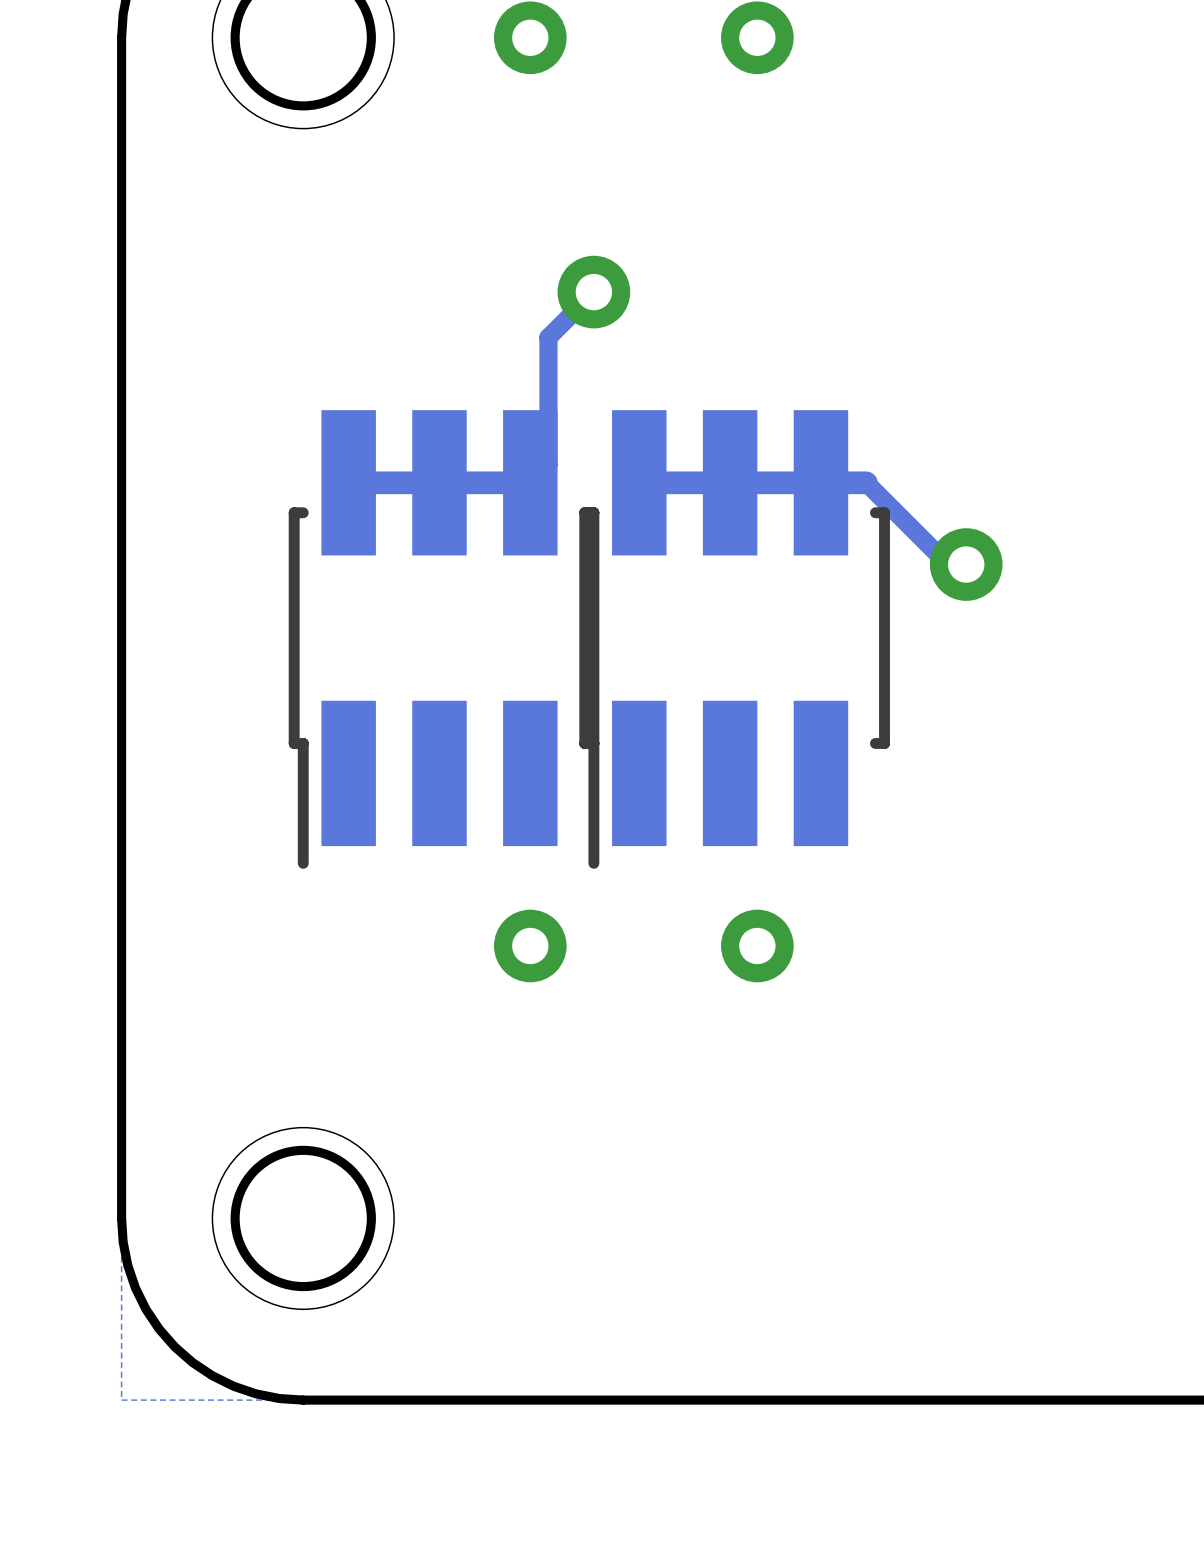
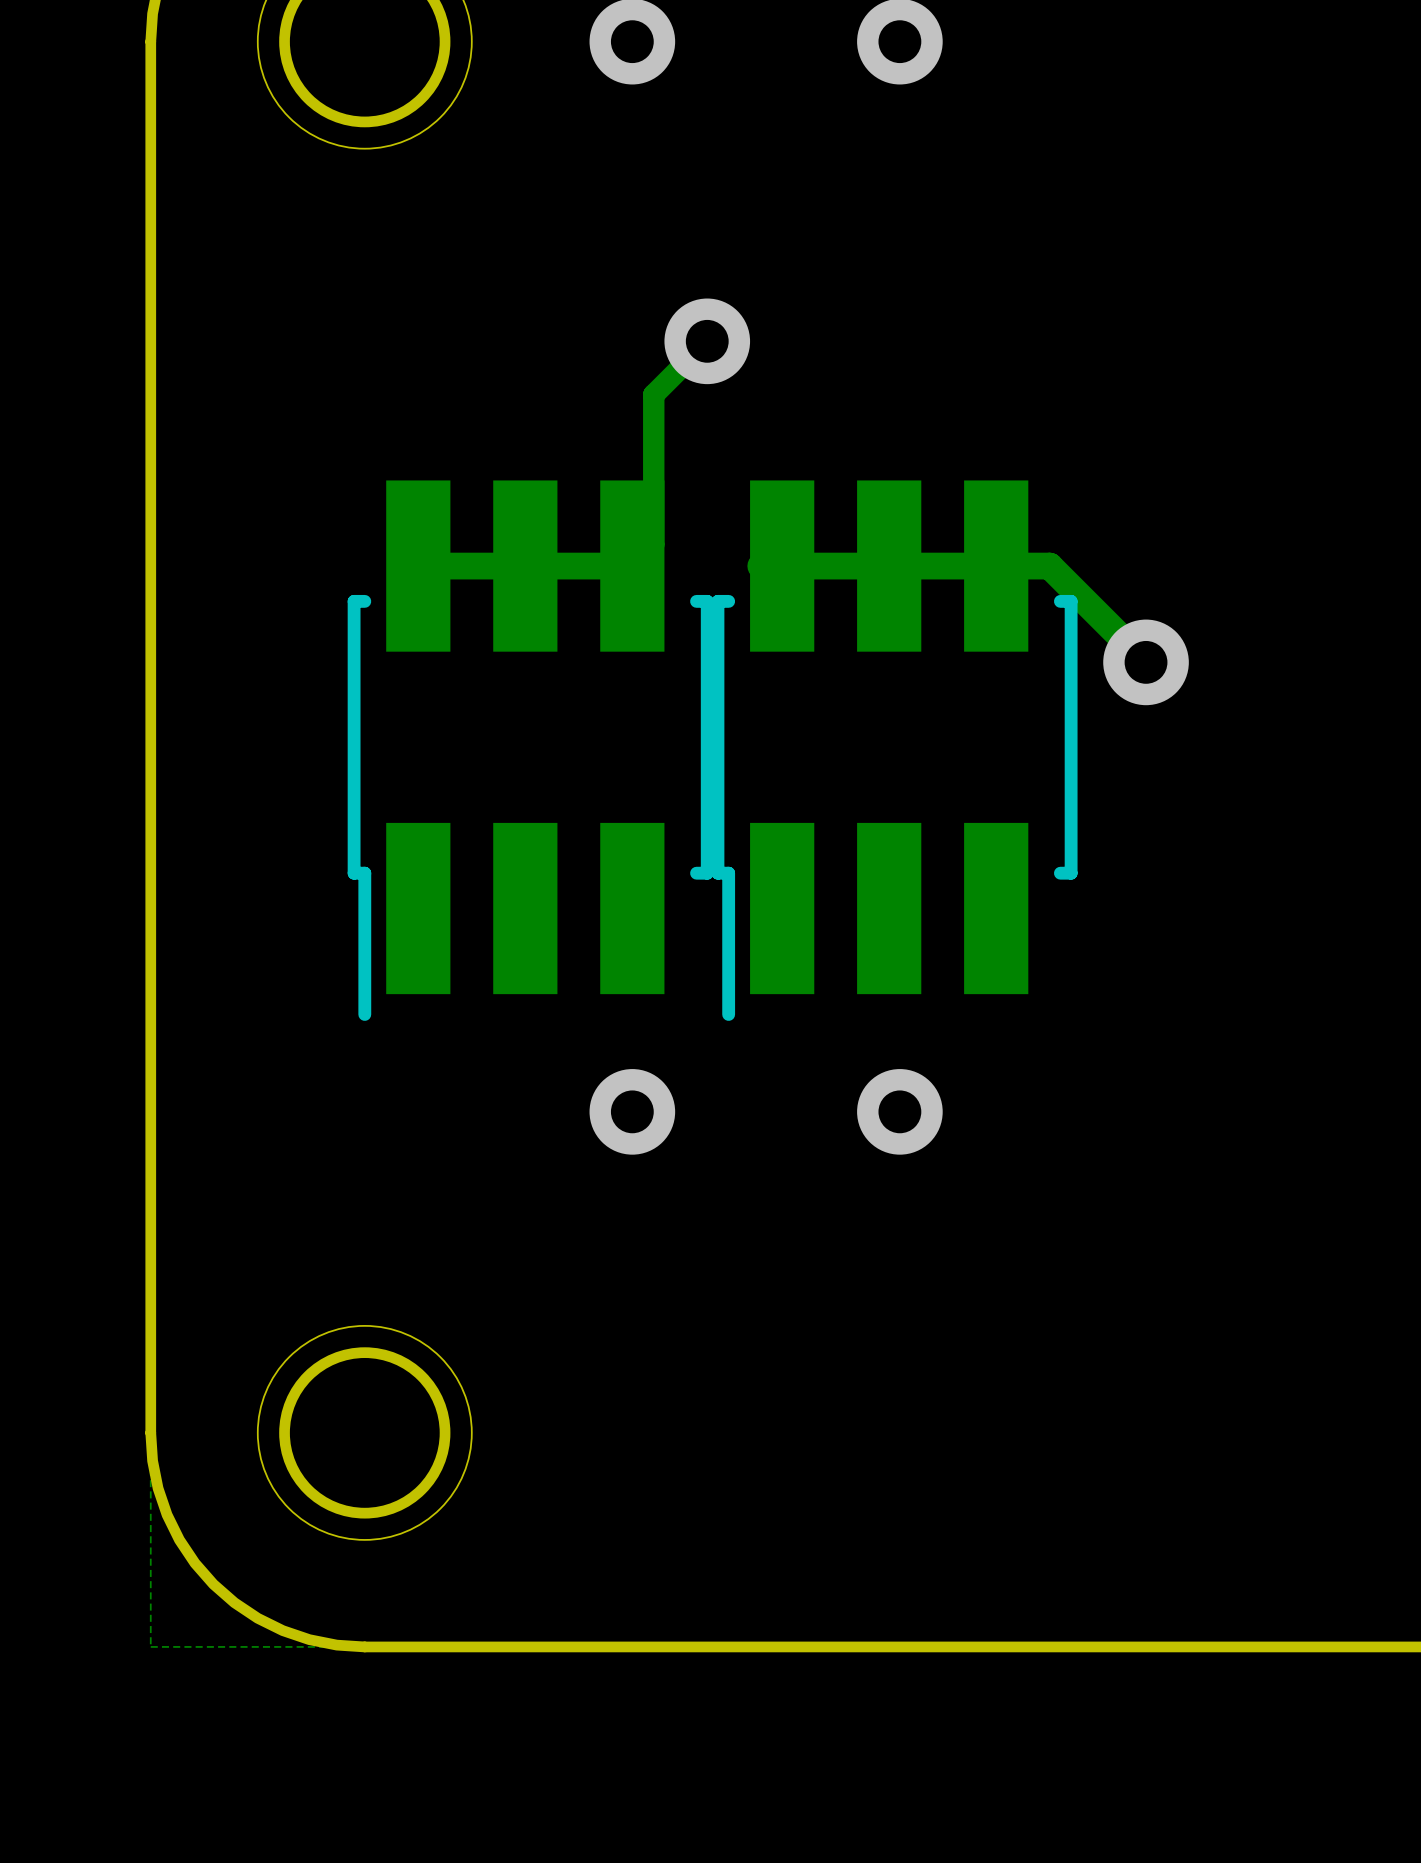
track: (866, 482) (948, 564) -> (1028, 566) (1049, 566) (1146, 662)
part position: (734, 639) -> (894, 750)

